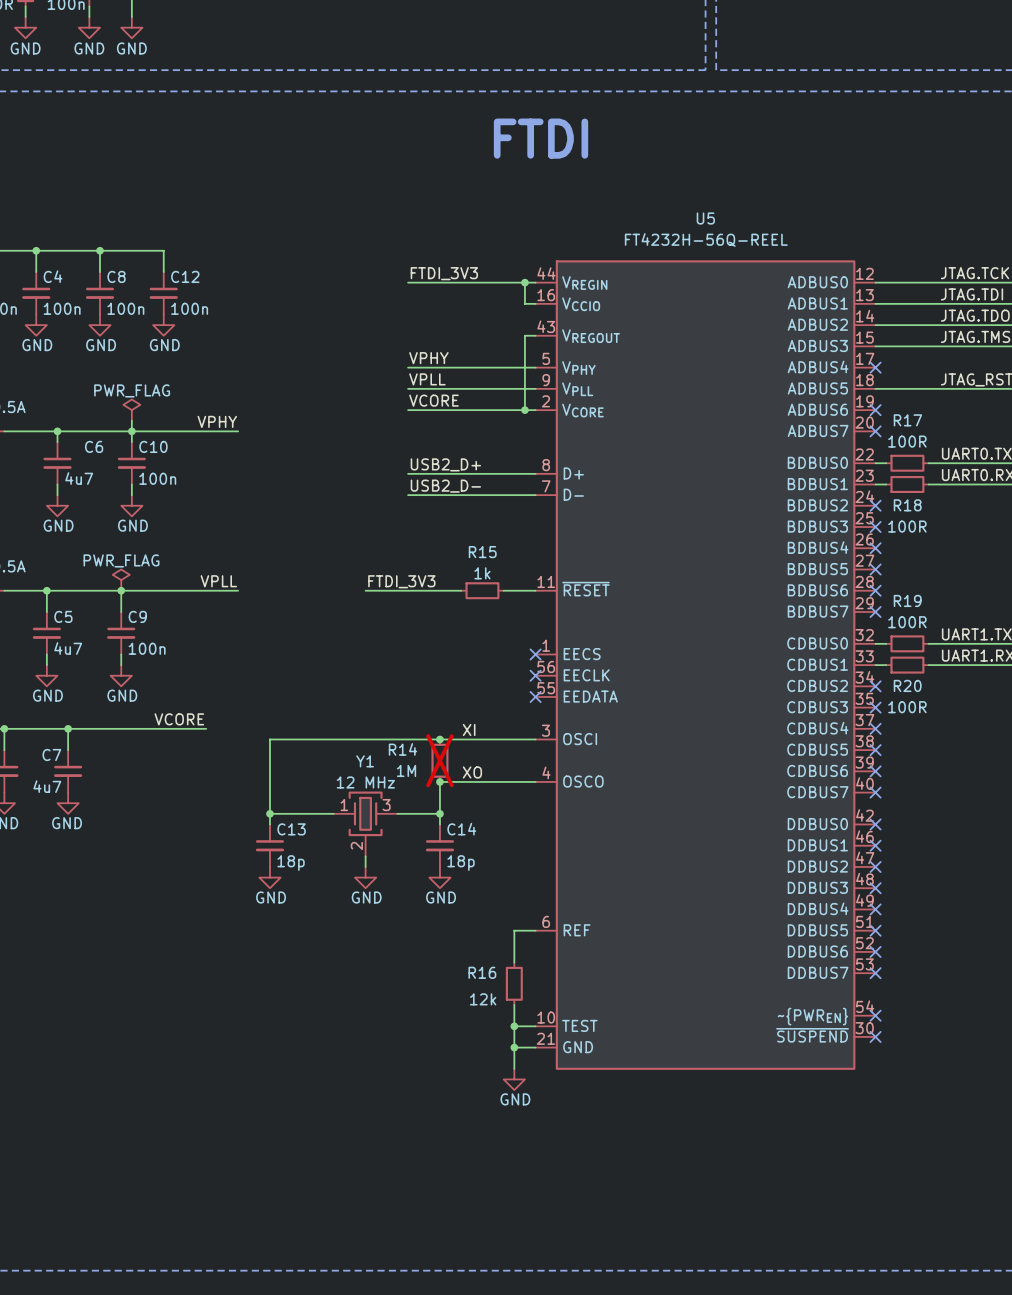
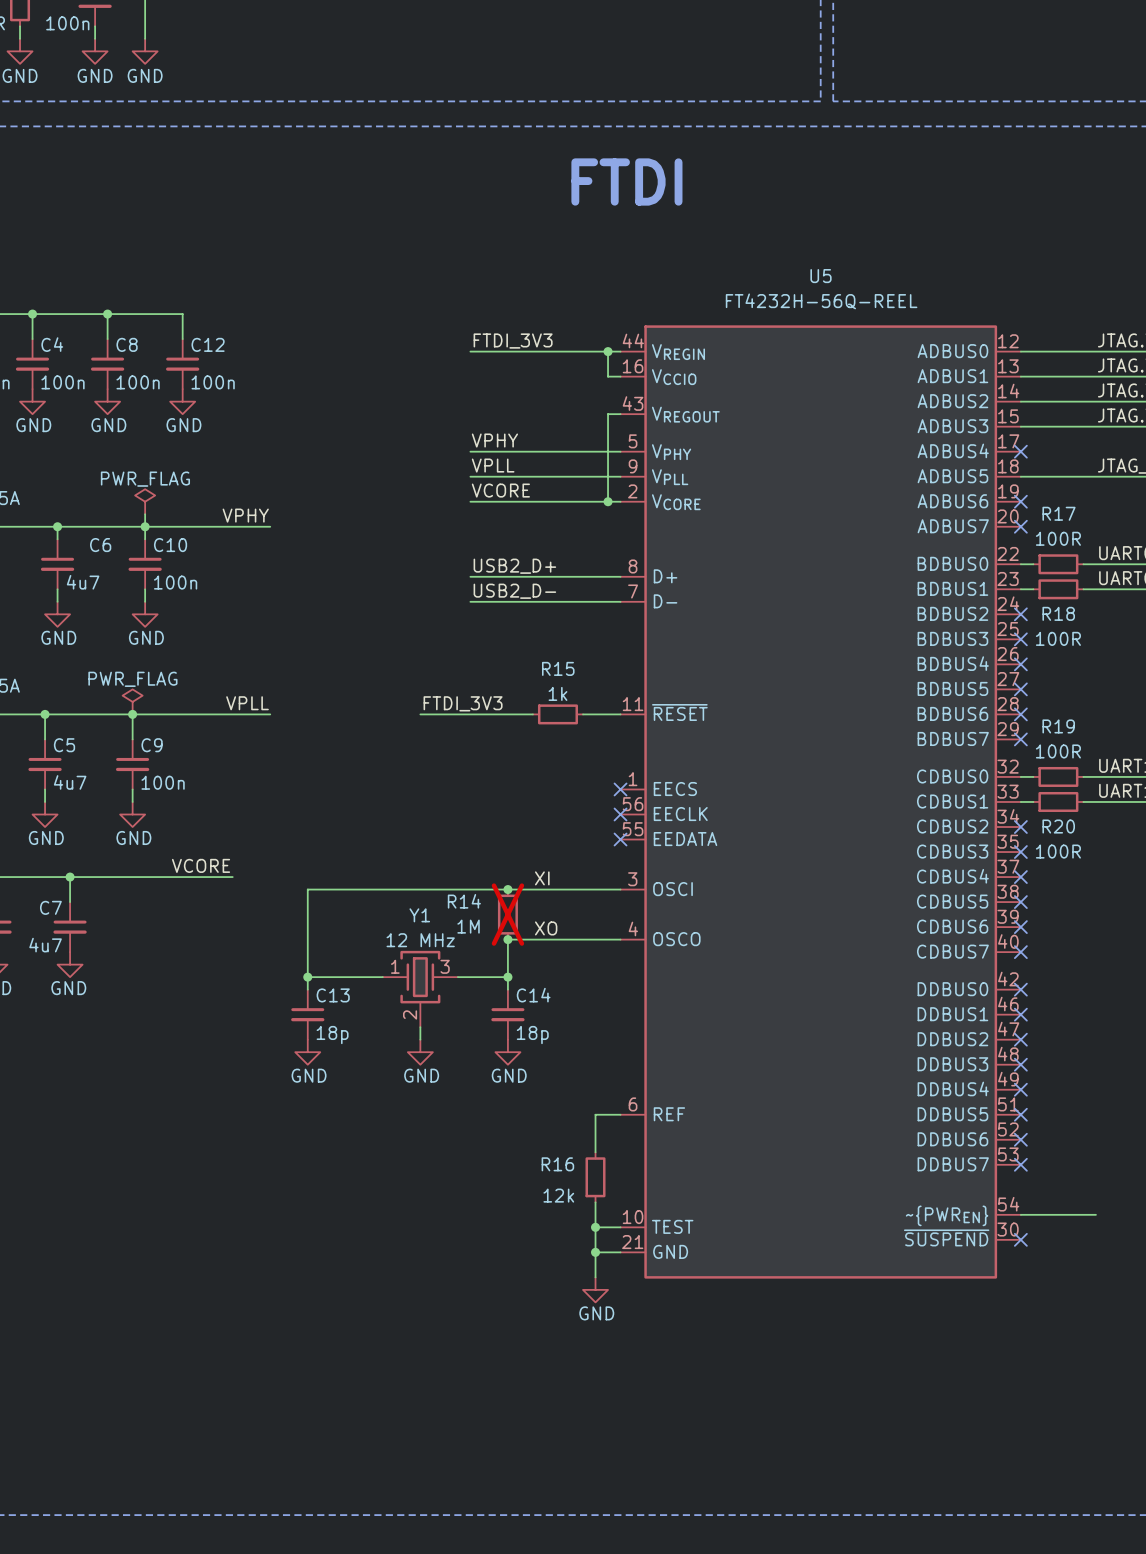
wire: none -> (1020, 1214) (1095, 1214)
no-connect mark: (875, 1015) -> none

